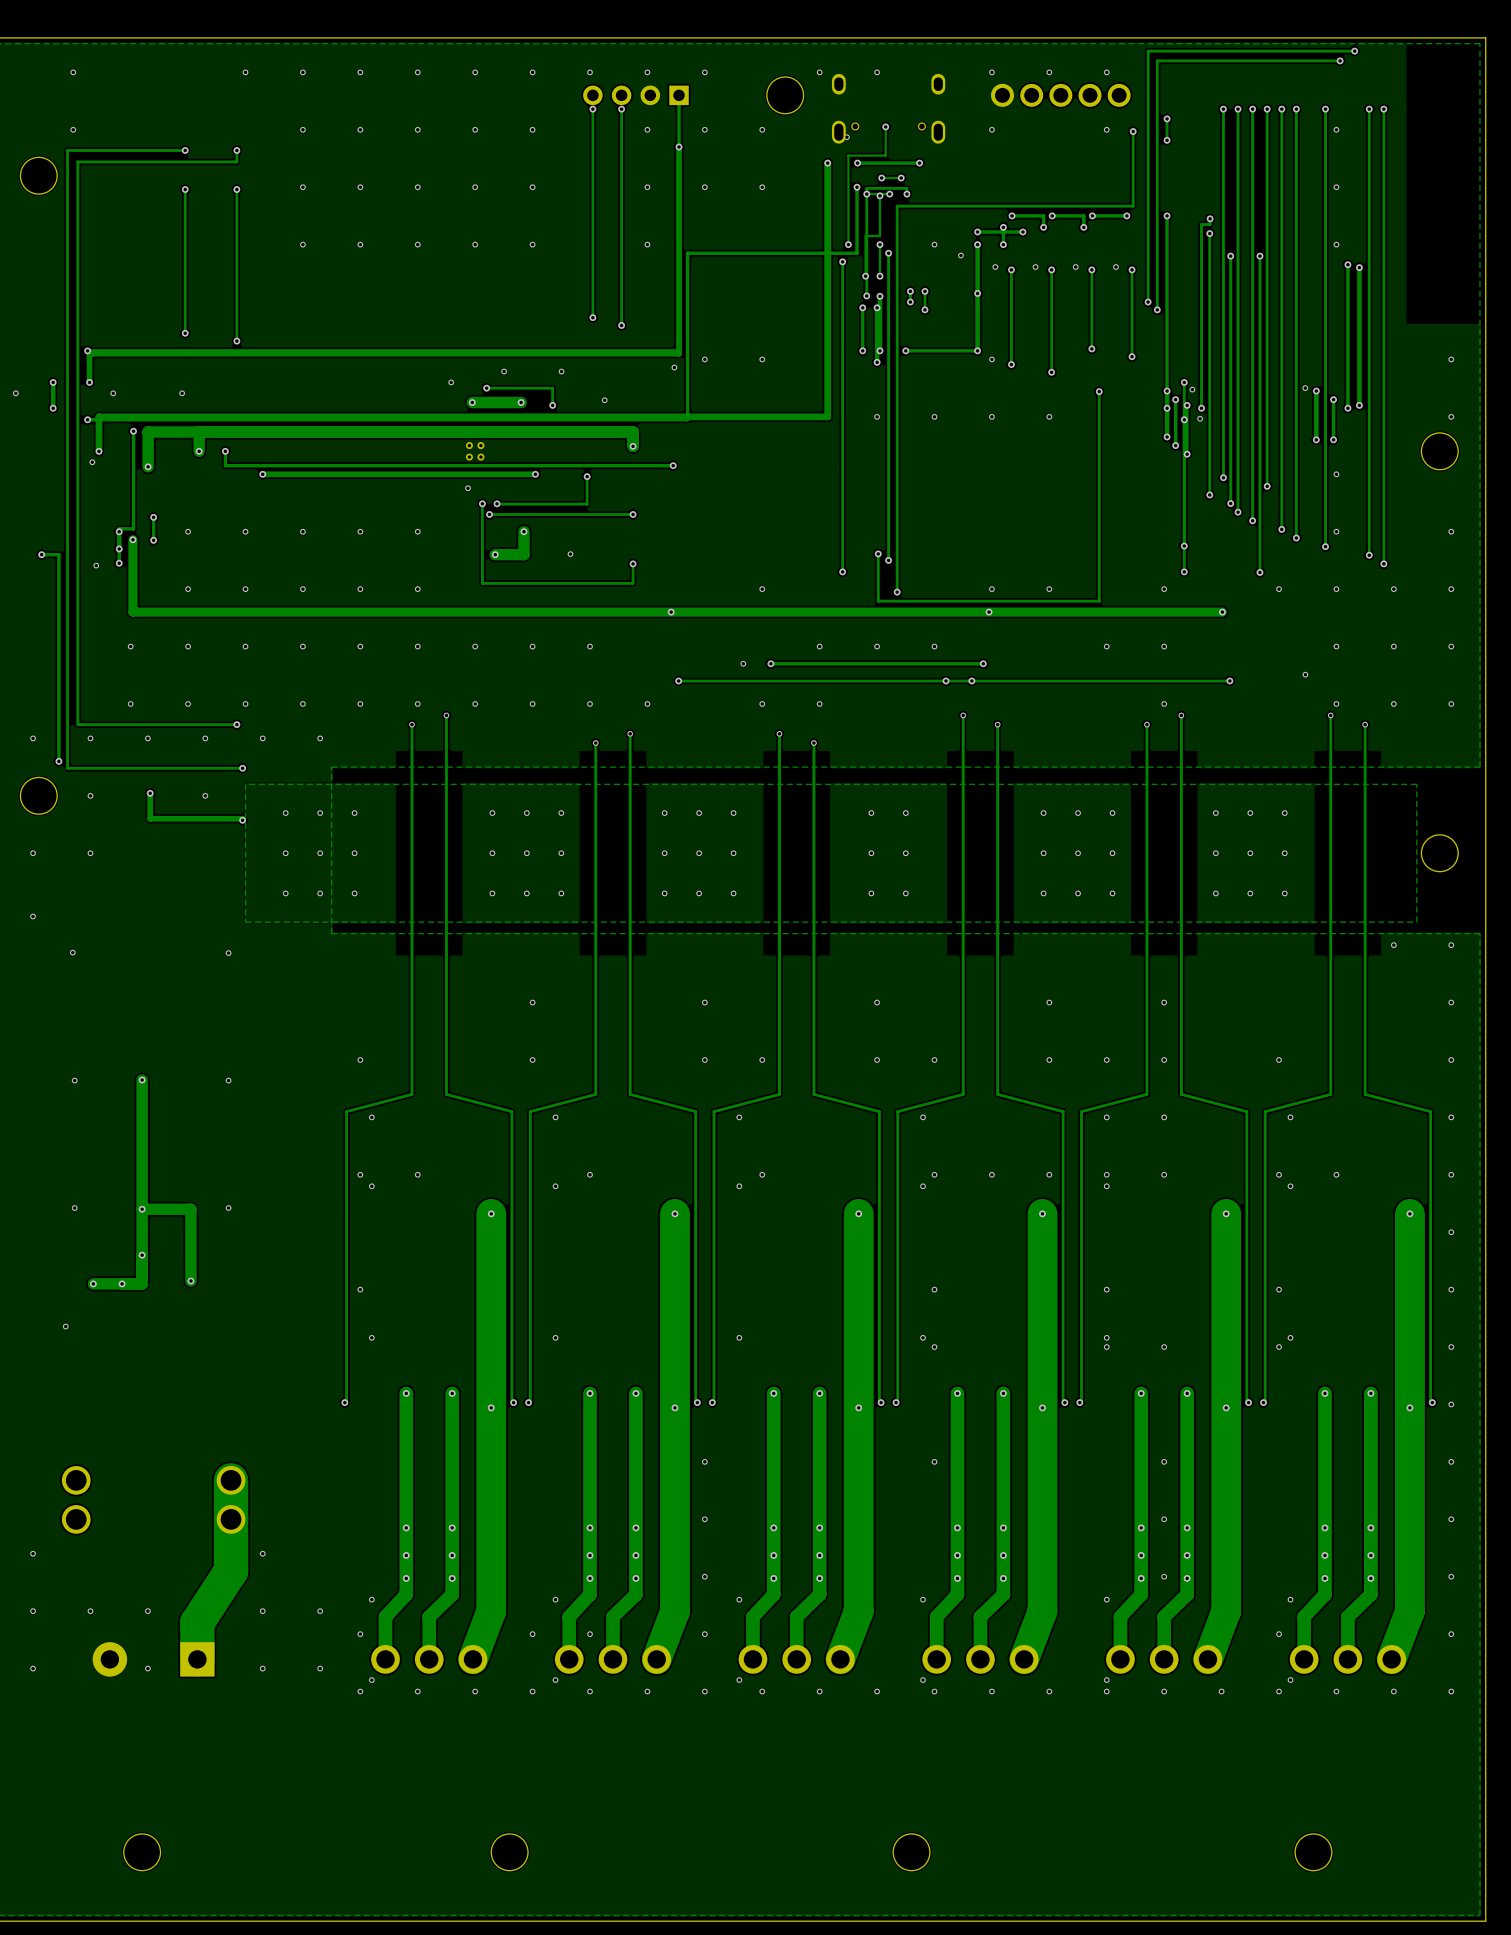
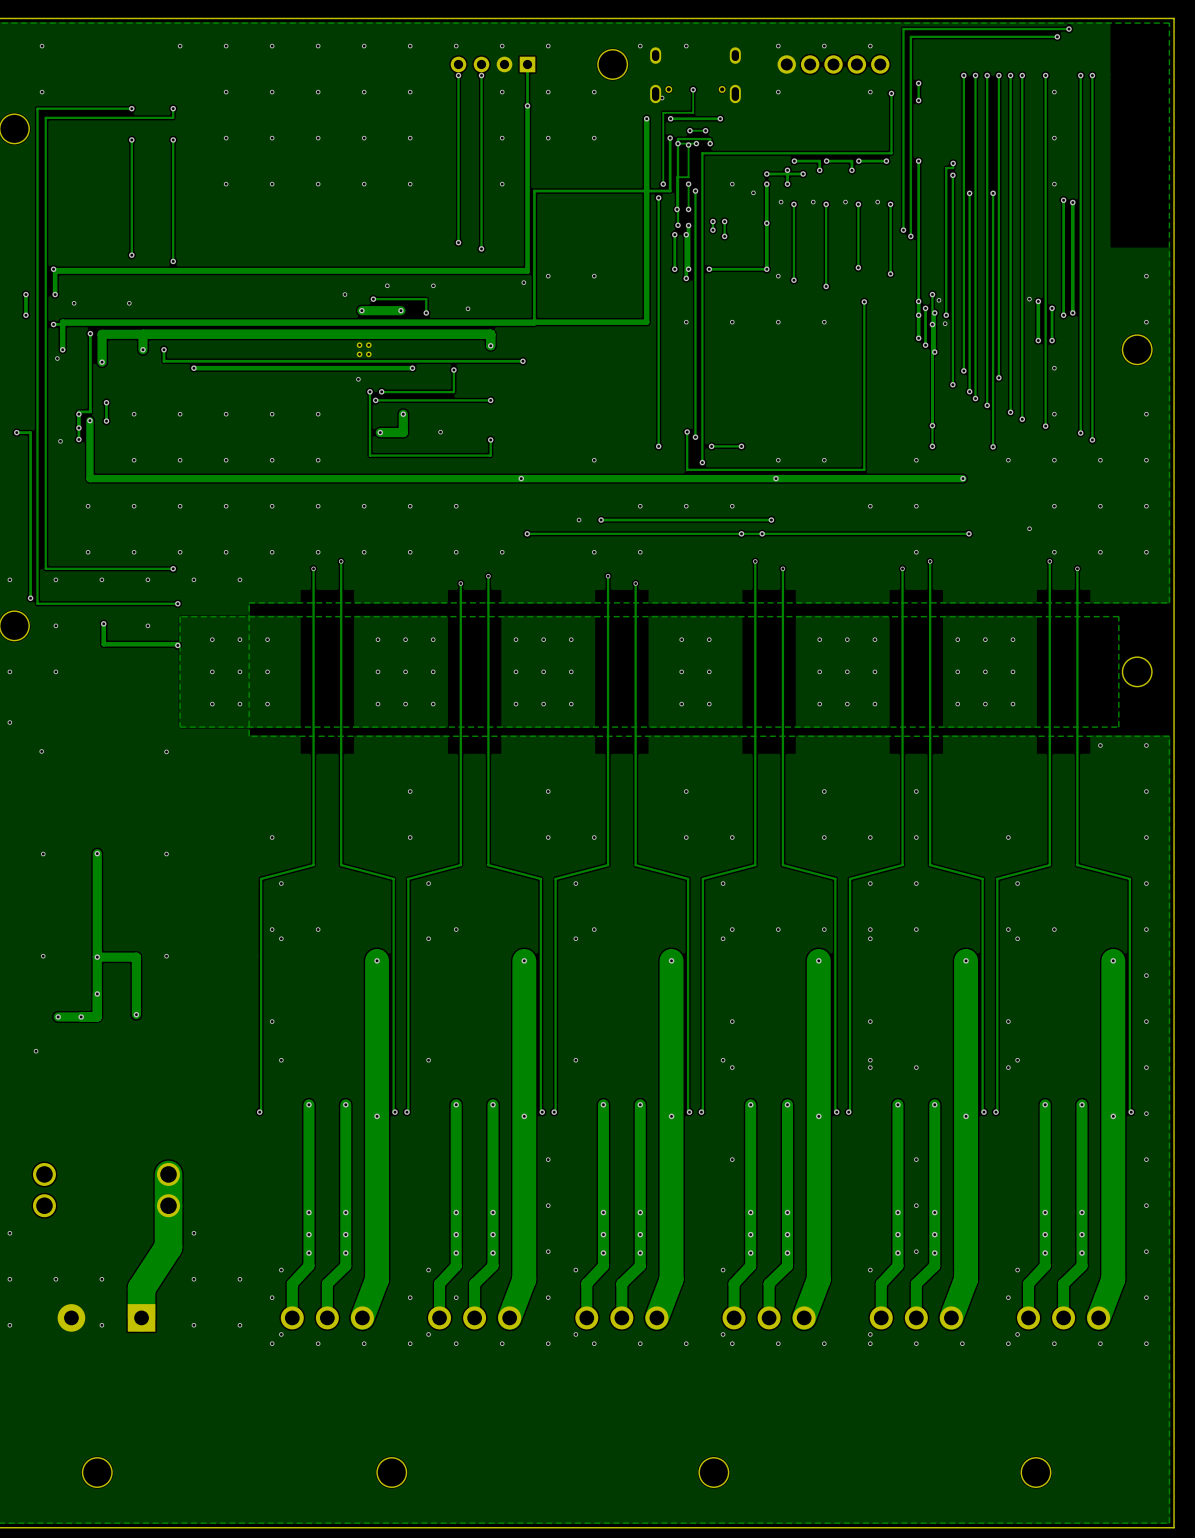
via: none -> (711, 446)
track: none -> (741, 446) (711, 446)
via: none -> (741, 446)

